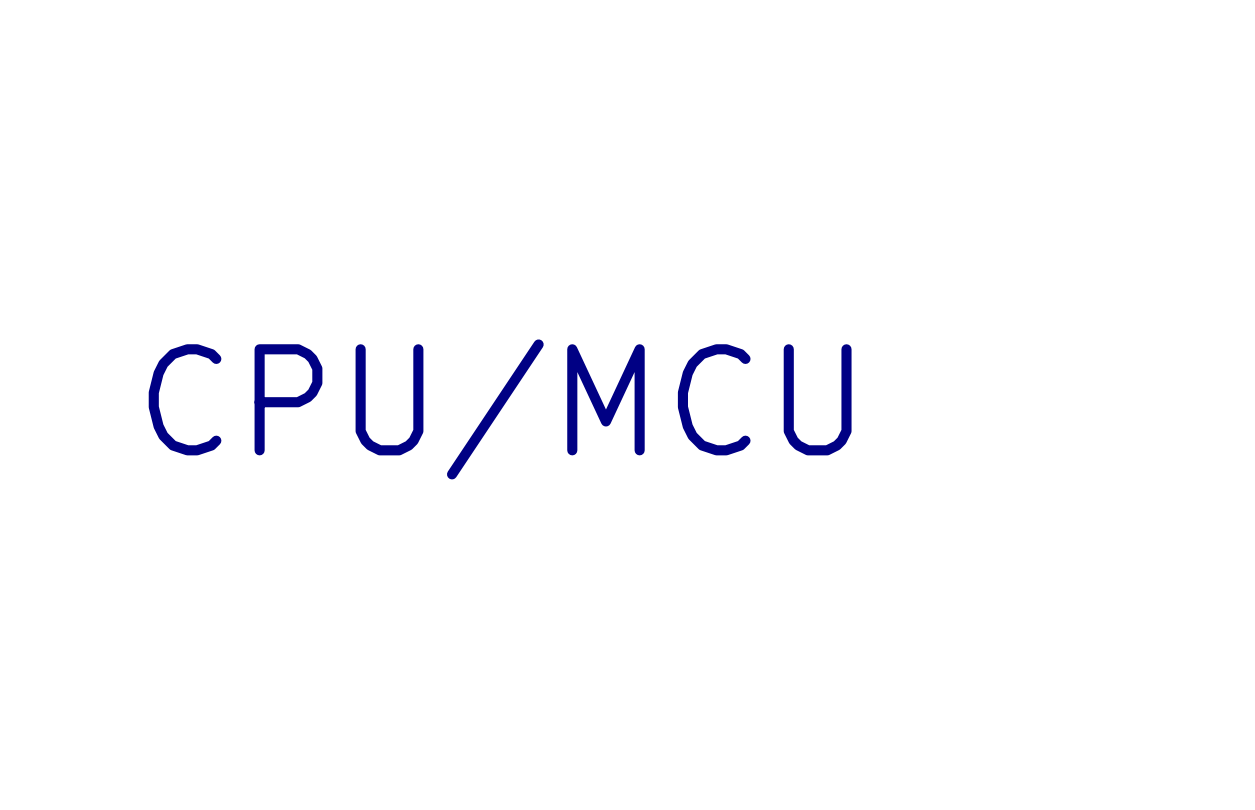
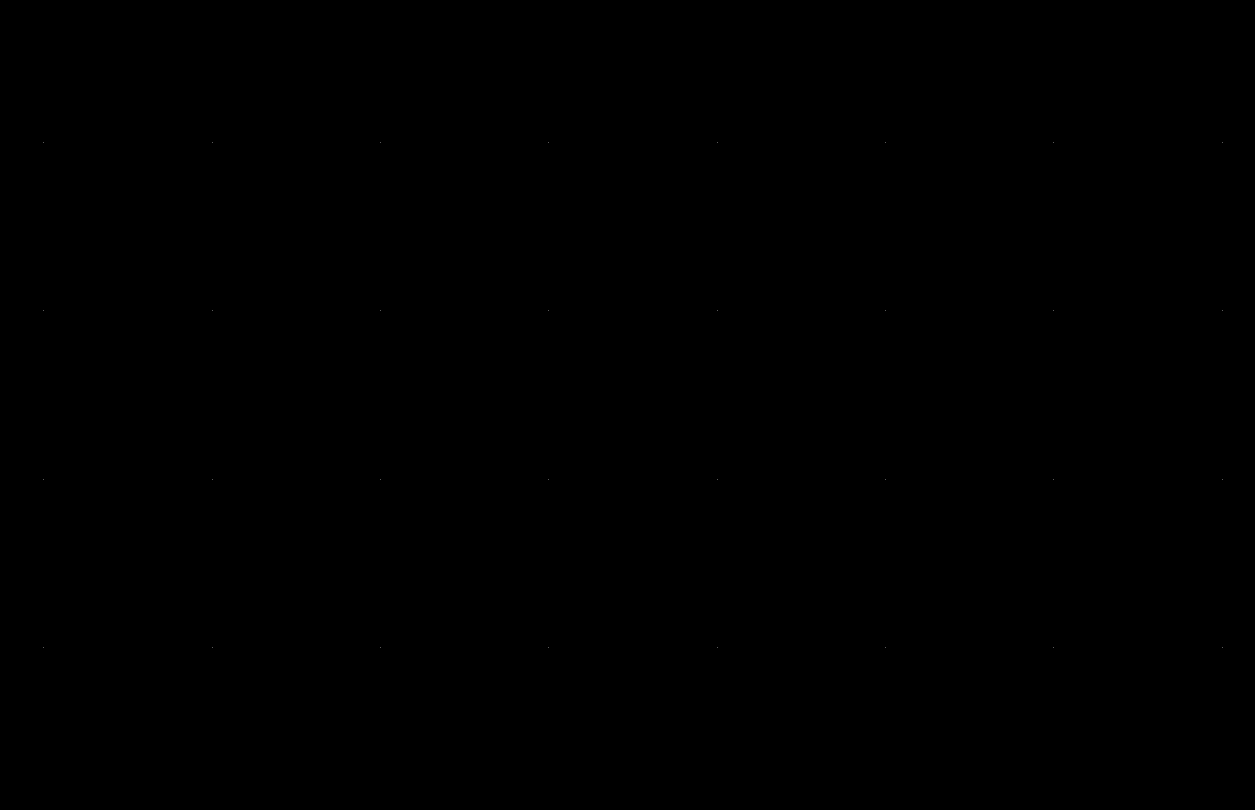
text: CPU/MCU (500, 409) -> none

